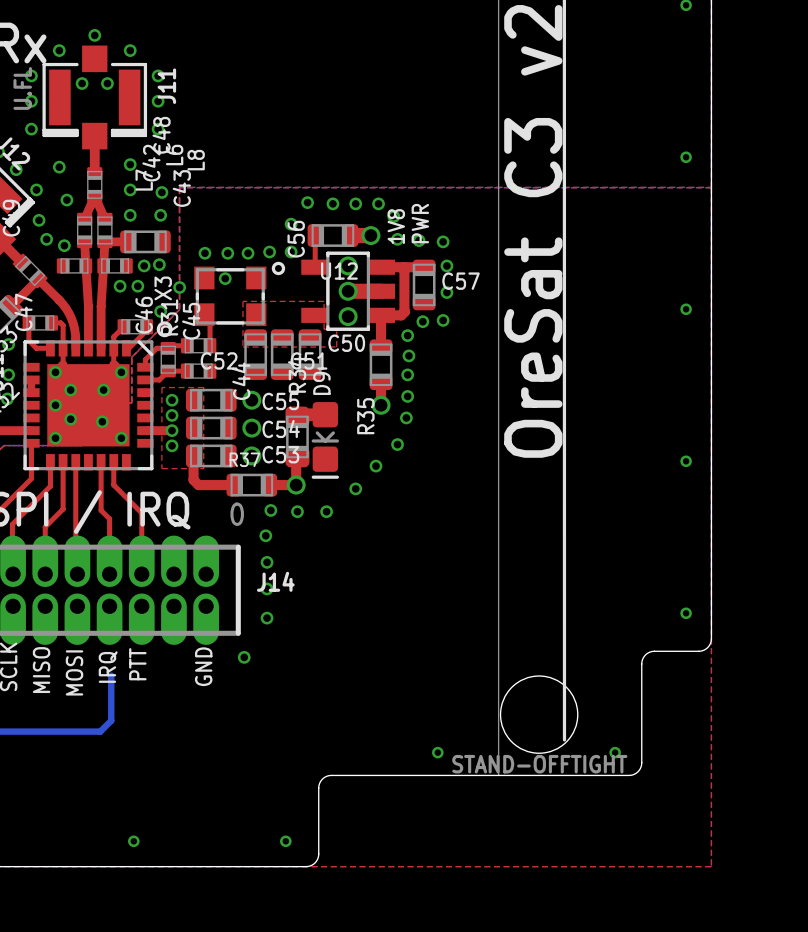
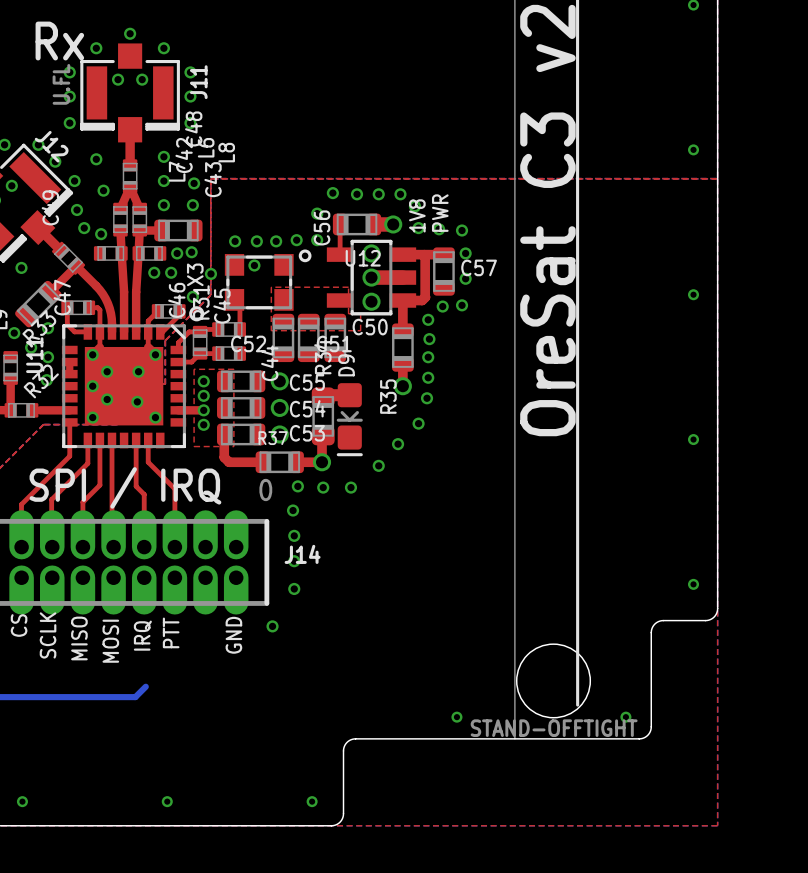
bottom track: (111, 675) (111, 720) -> none

